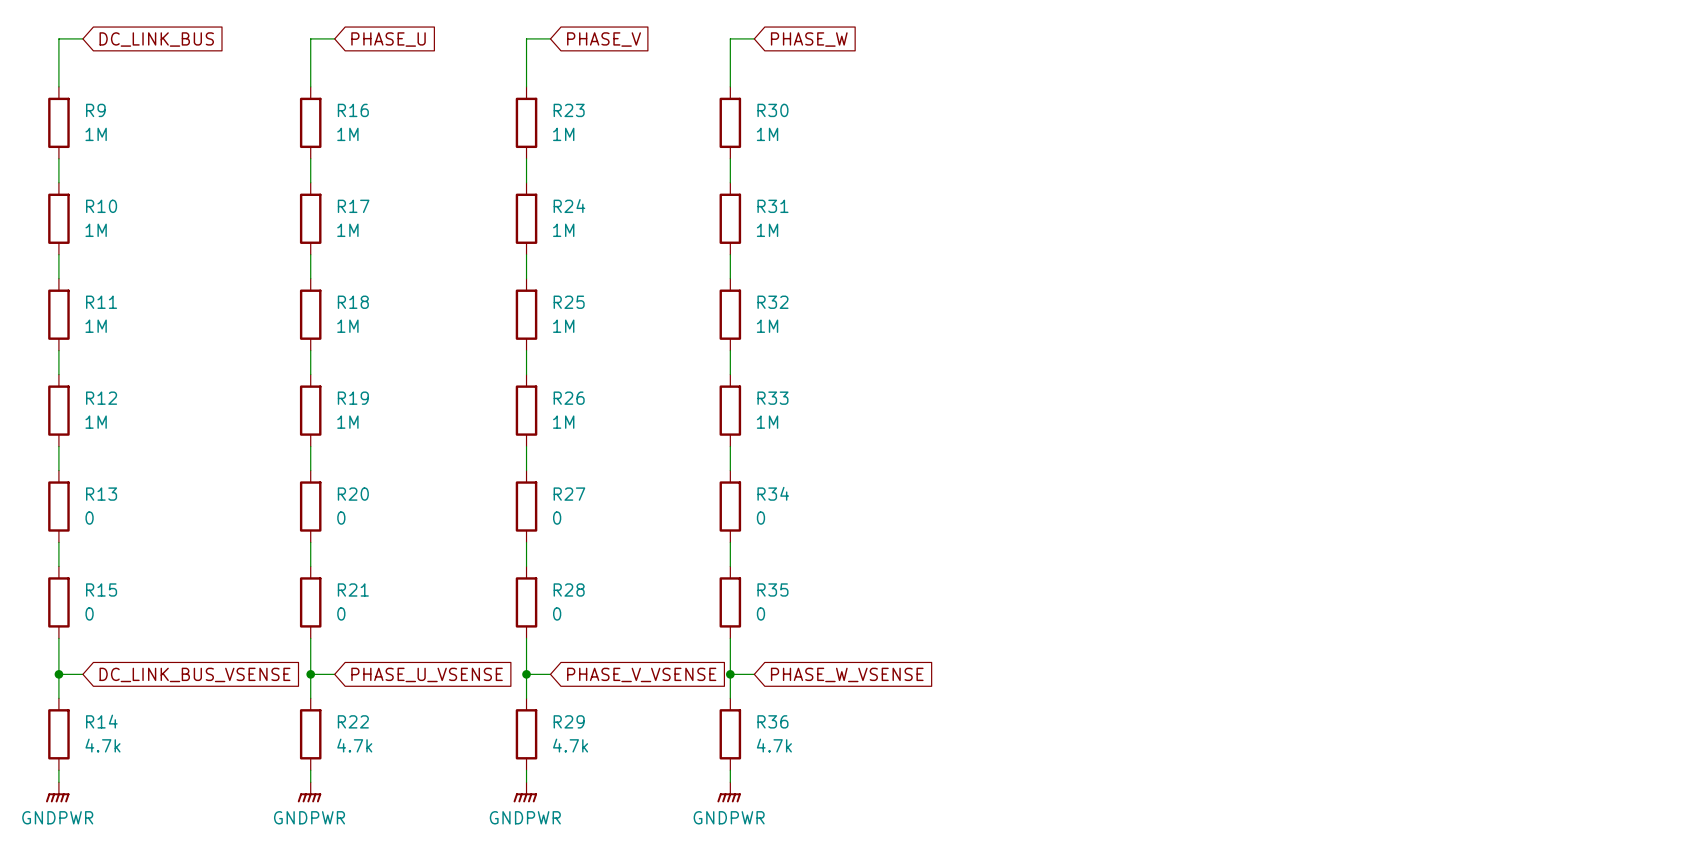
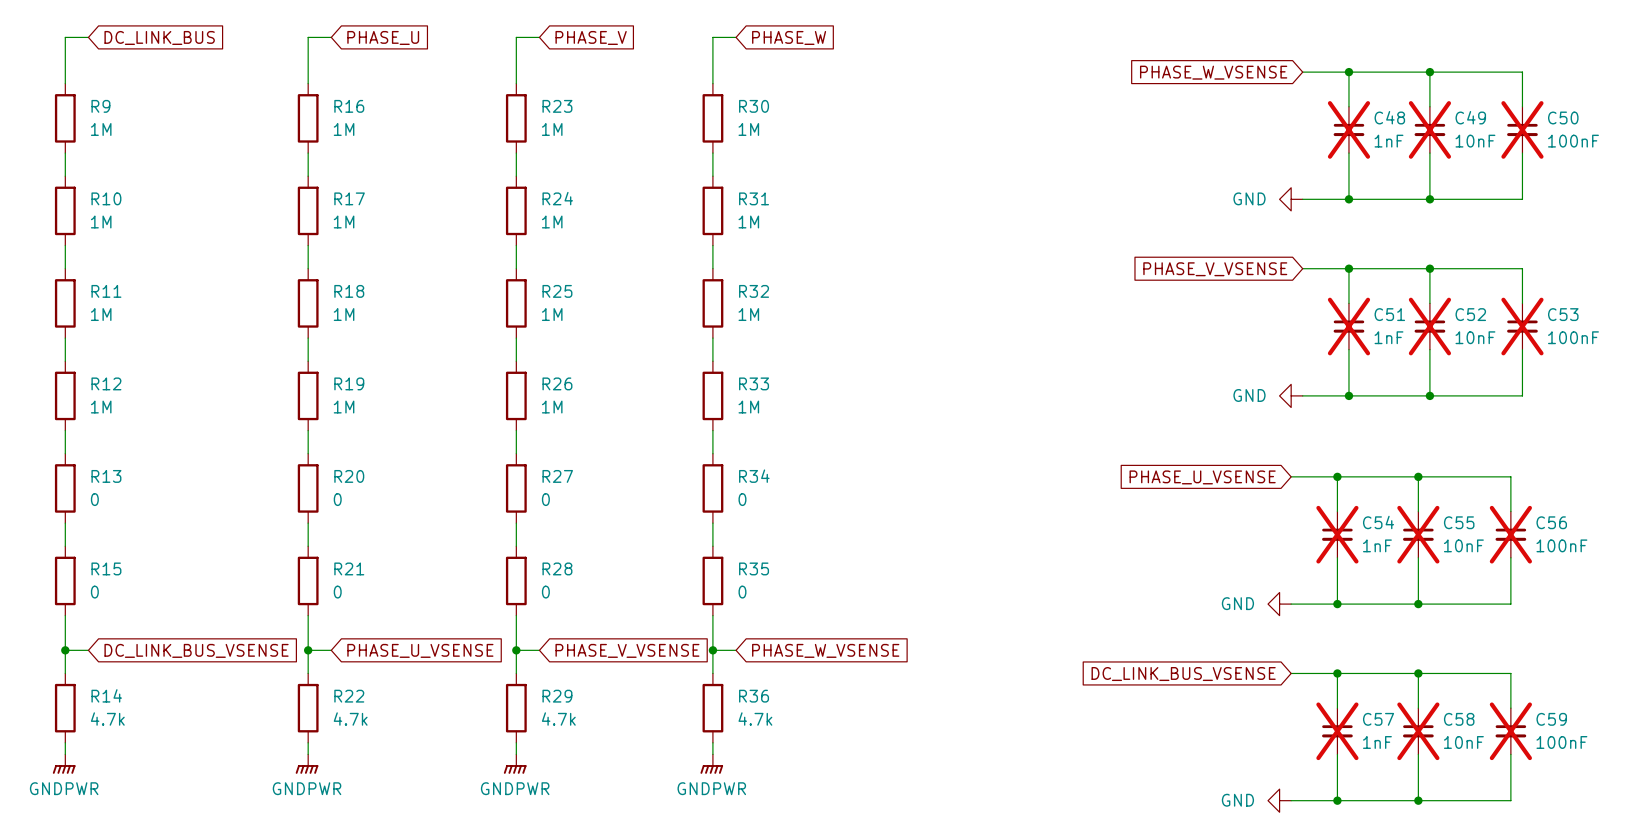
wire: none -> (1302, 72) (1522, 72) (1522, 106)
wire: none -> (1348, 72) (1348, 106)
junction: none -> (1348, 72)
wire: none -> (1429, 72) (1429, 106)
junction: none -> (1429, 72)
global label: none -> PHASE_W_VSENSE (1213, 72)
C48: none -> 1nF (1348, 129)
C49: none -> 10nF (1429, 129)
C50: none -> 100nF (1522, 129)
wire: none -> (1348, 153) (1348, 199)
wire: none -> (1429, 153) (1429, 199)
wire: none -> (1522, 153) (1522, 199) (1302, 199)
power symbol: none -> GND (1291, 199)
junction: none -> (1348, 199)
junction: none -> (1429, 199)
wire: none -> (1302, 268) (1522, 268) (1522, 303)
wire: none -> (1348, 268) (1348, 303)
junction: none -> (1348, 268)
wire: none -> (1429, 268) (1429, 303)
junction: none -> (1429, 268)
global label: none -> PHASE_V_VSENSE (1215, 269)
C51: none -> 1nF (1348, 326)
C52: none -> 10nF (1429, 326)
C53: none -> 100nF (1522, 326)
wire: none -> (1348, 349) (1348, 395)
wire: none -> (1429, 349) (1429, 395)
wire: none -> (1522, 349) (1522, 395) (1302, 395)
power symbol: none -> GND (1291, 395)
junction: none -> (1348, 395)
junction: none -> (1429, 395)
wire: none -> (1291, 476) (1510, 476) (1510, 511)
wire: none -> (1337, 476) (1337, 511)
junction: none -> (1337, 476)
wire: none -> (1418, 476) (1418, 511)
junction: none -> (1418, 476)
global label: none -> PHASE_U_VSENSE (1202, 477)
C54: none -> 1nF (1337, 534)
C55: none -> 10nF (1418, 534)
C56: none -> 100nF (1510, 534)
wire: none -> (1337, 557) (1337, 604)
wire: none -> (1418, 557) (1418, 604)
wire: none -> (1510, 557) (1510, 604) (1291, 604)
power symbol: none -> GND (1279, 604)
junction: none -> (1337, 604)
junction: none -> (1418, 604)
global label: none -> DC_LINK_BUS_VSENSE (1183, 674)
wire: none -> (1291, 673) (1510, 673) (1510, 708)
wire: none -> (1337, 673) (1337, 708)
junction: none -> (1337, 673)
wire: none -> (1418, 673) (1418, 708)
junction: none -> (1418, 673)
C57: none -> 1nF (1337, 731)
C58: none -> 10nF (1418, 731)
C59: none -> 100nF (1510, 731)
wire: none -> (1337, 754) (1337, 800)
wire: none -> (1418, 754) (1418, 800)
wire: none -> (1510, 754) (1510, 800) (1291, 800)
power symbol: none -> GND (1279, 800)
junction: none -> (1337, 800)
junction: none -> (1418, 800)

